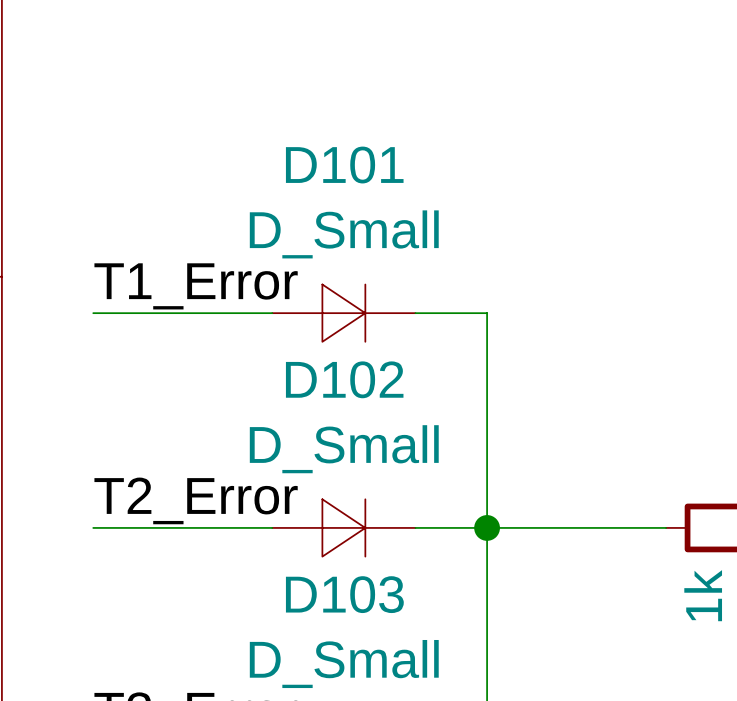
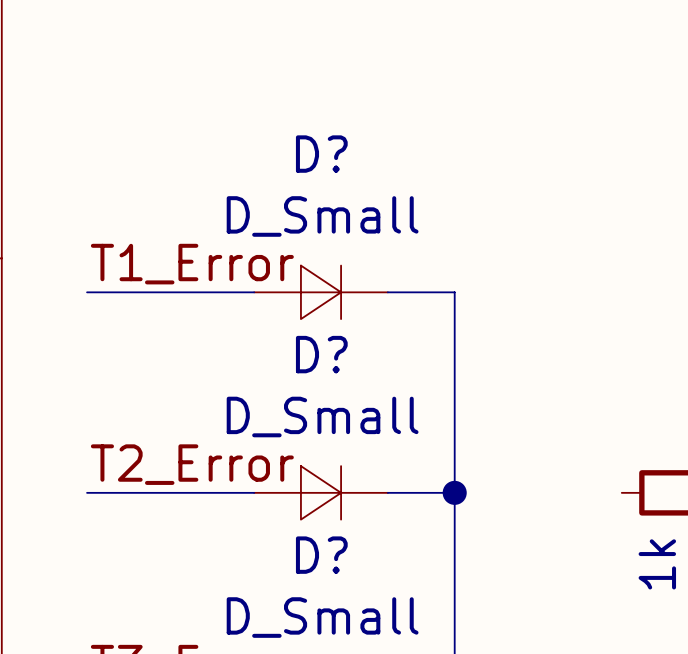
D101 name: D101 (344, 165) -> D? (321, 154)
D102 name: D102 (344, 379) -> D? (321, 354)
wire: (487, 527) (666, 527) -> none
D103 name: D103 (344, 594) -> D? (321, 555)

